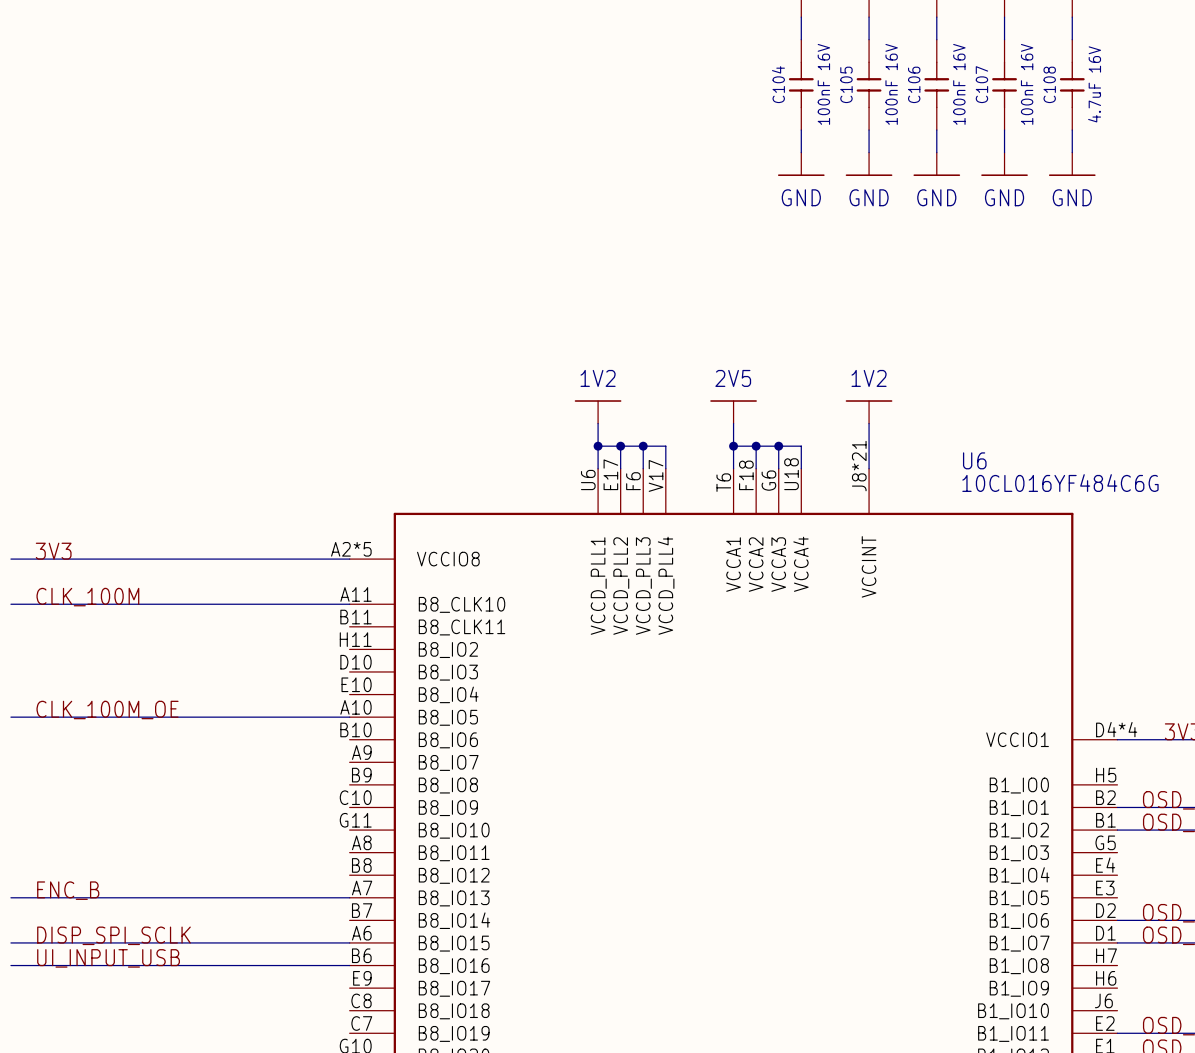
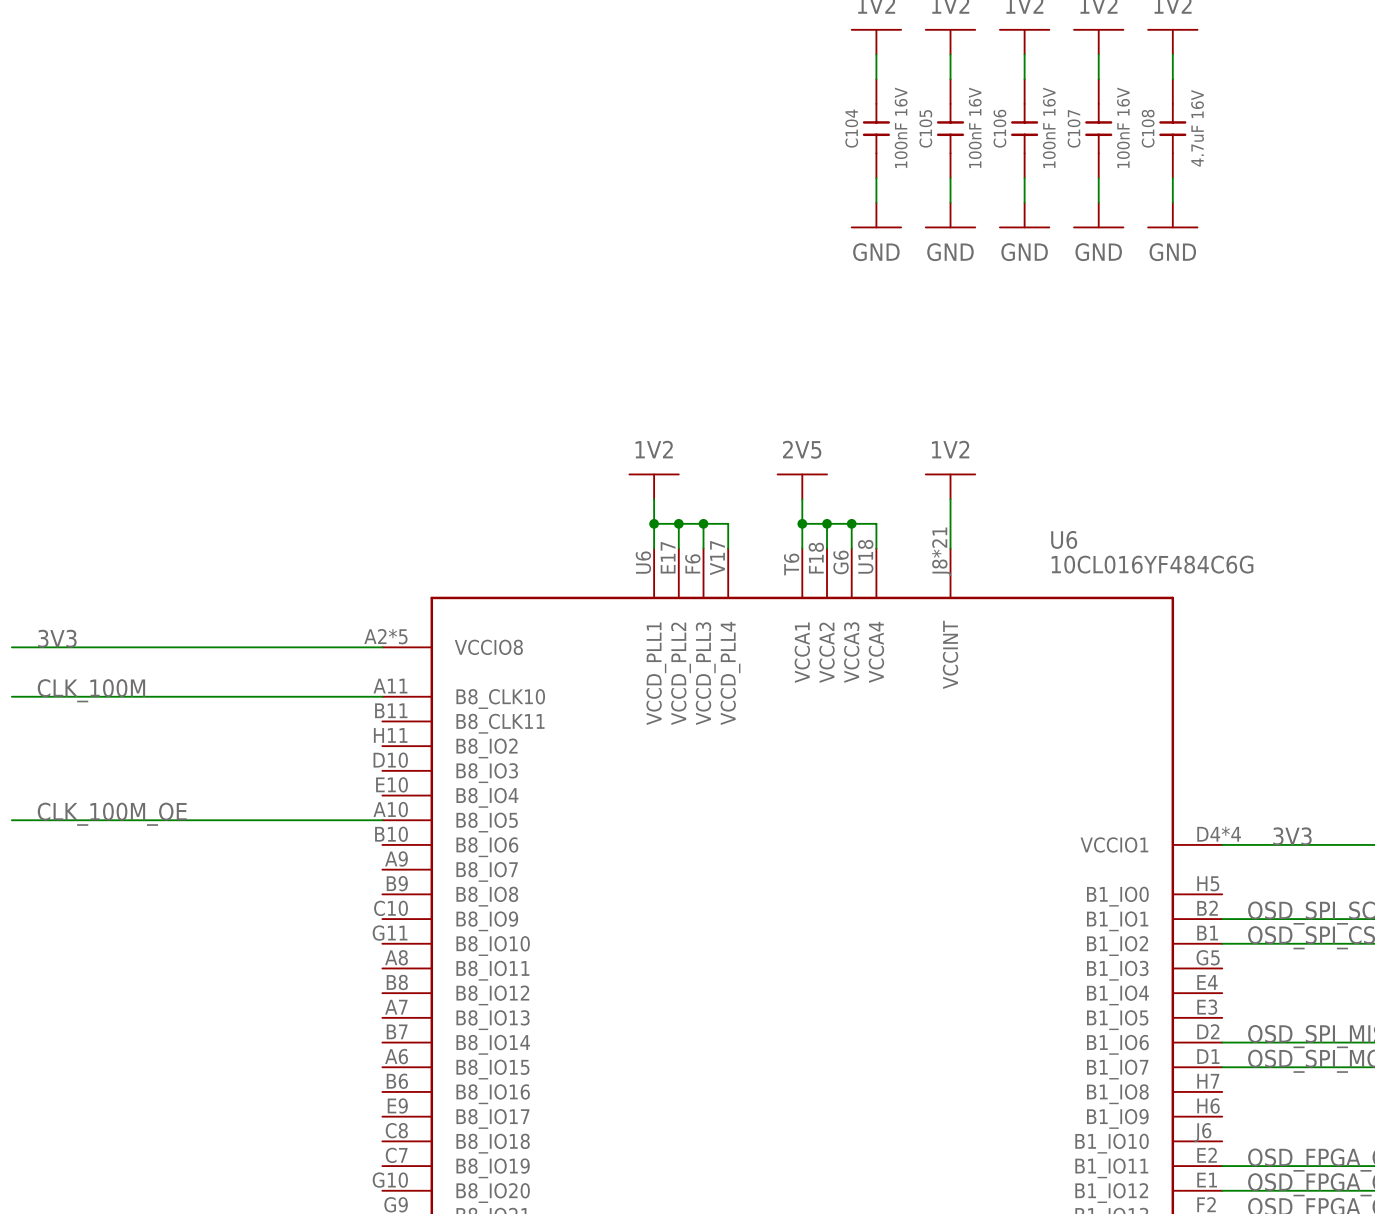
label: ENC_B (68, 890) -> none
wire: (10, 897) (349, 897) -> none
label: DISP_SPI_SCLK (113, 935) -> none
wire: (10, 942) (349, 942) -> none
label: UI_INPUT_USB (108, 958) -> none
wire: (10, 965) (349, 965) -> none

